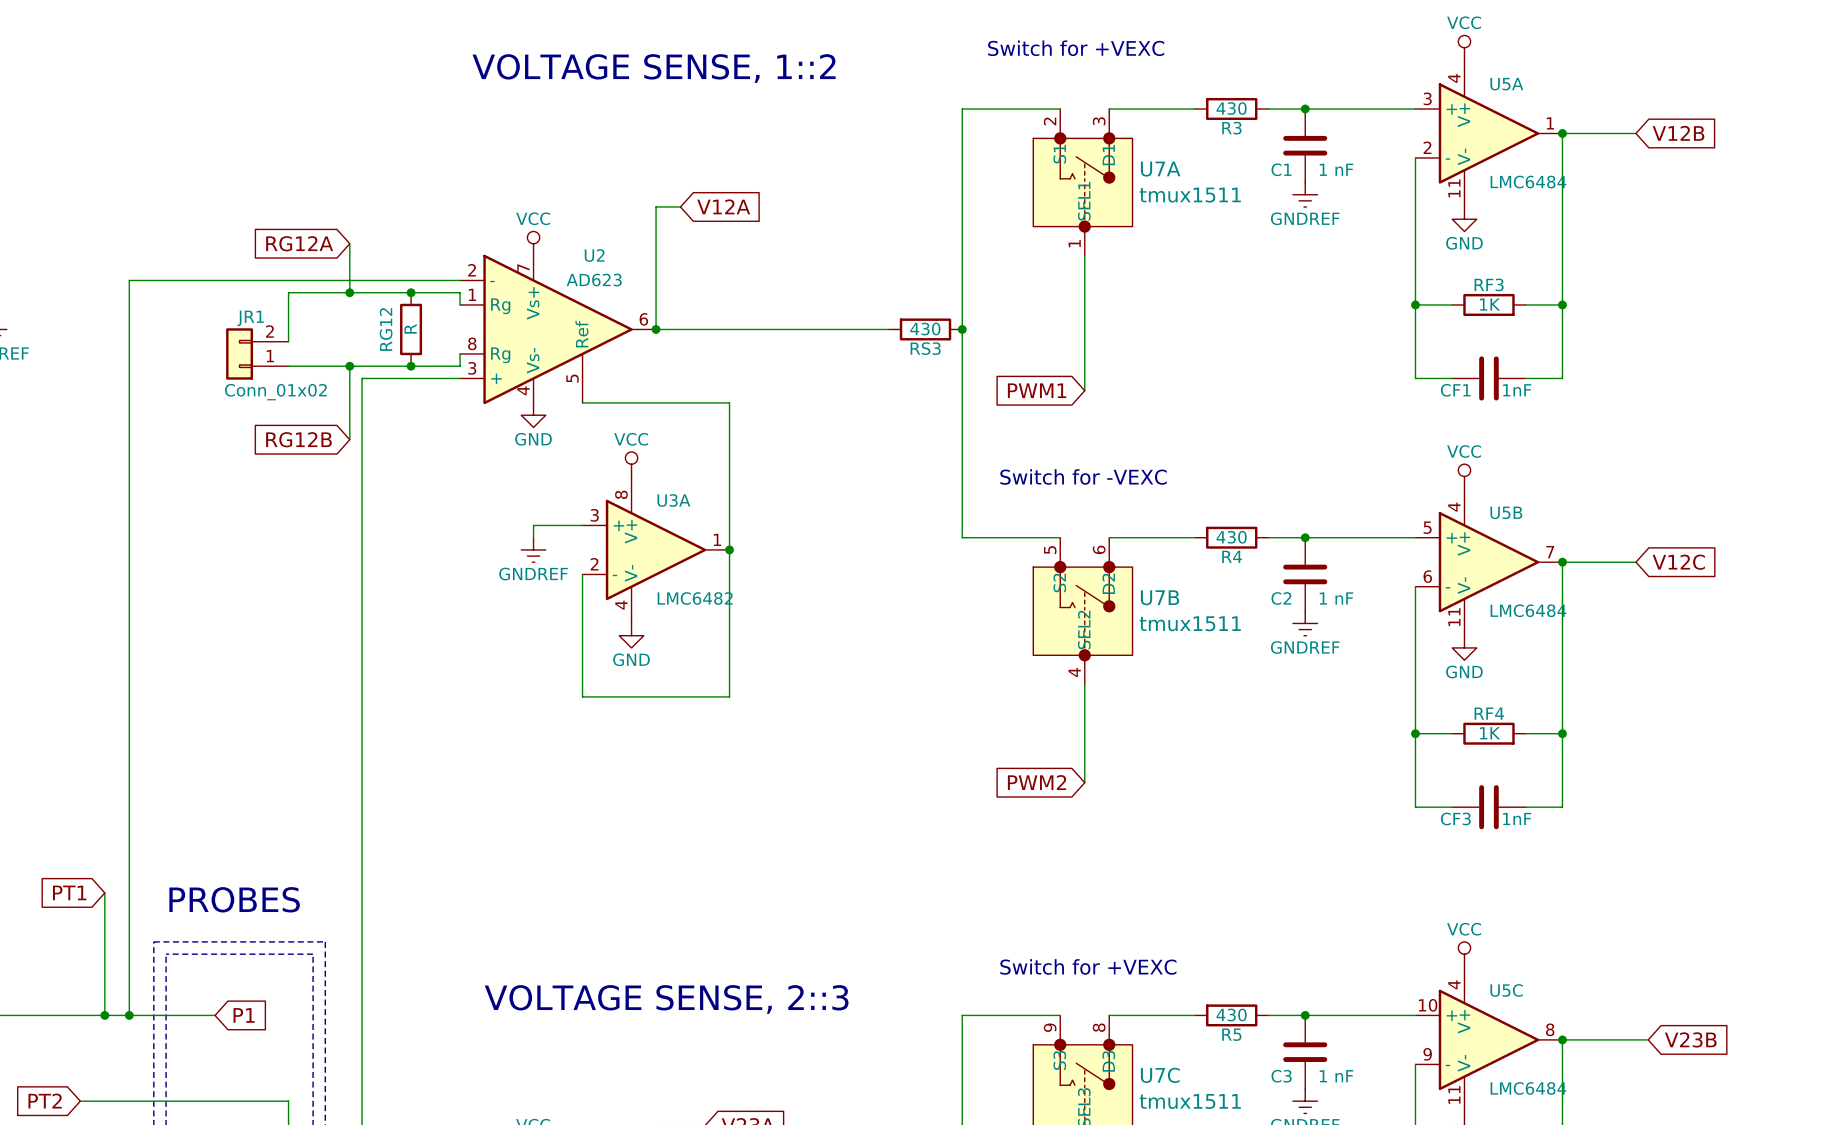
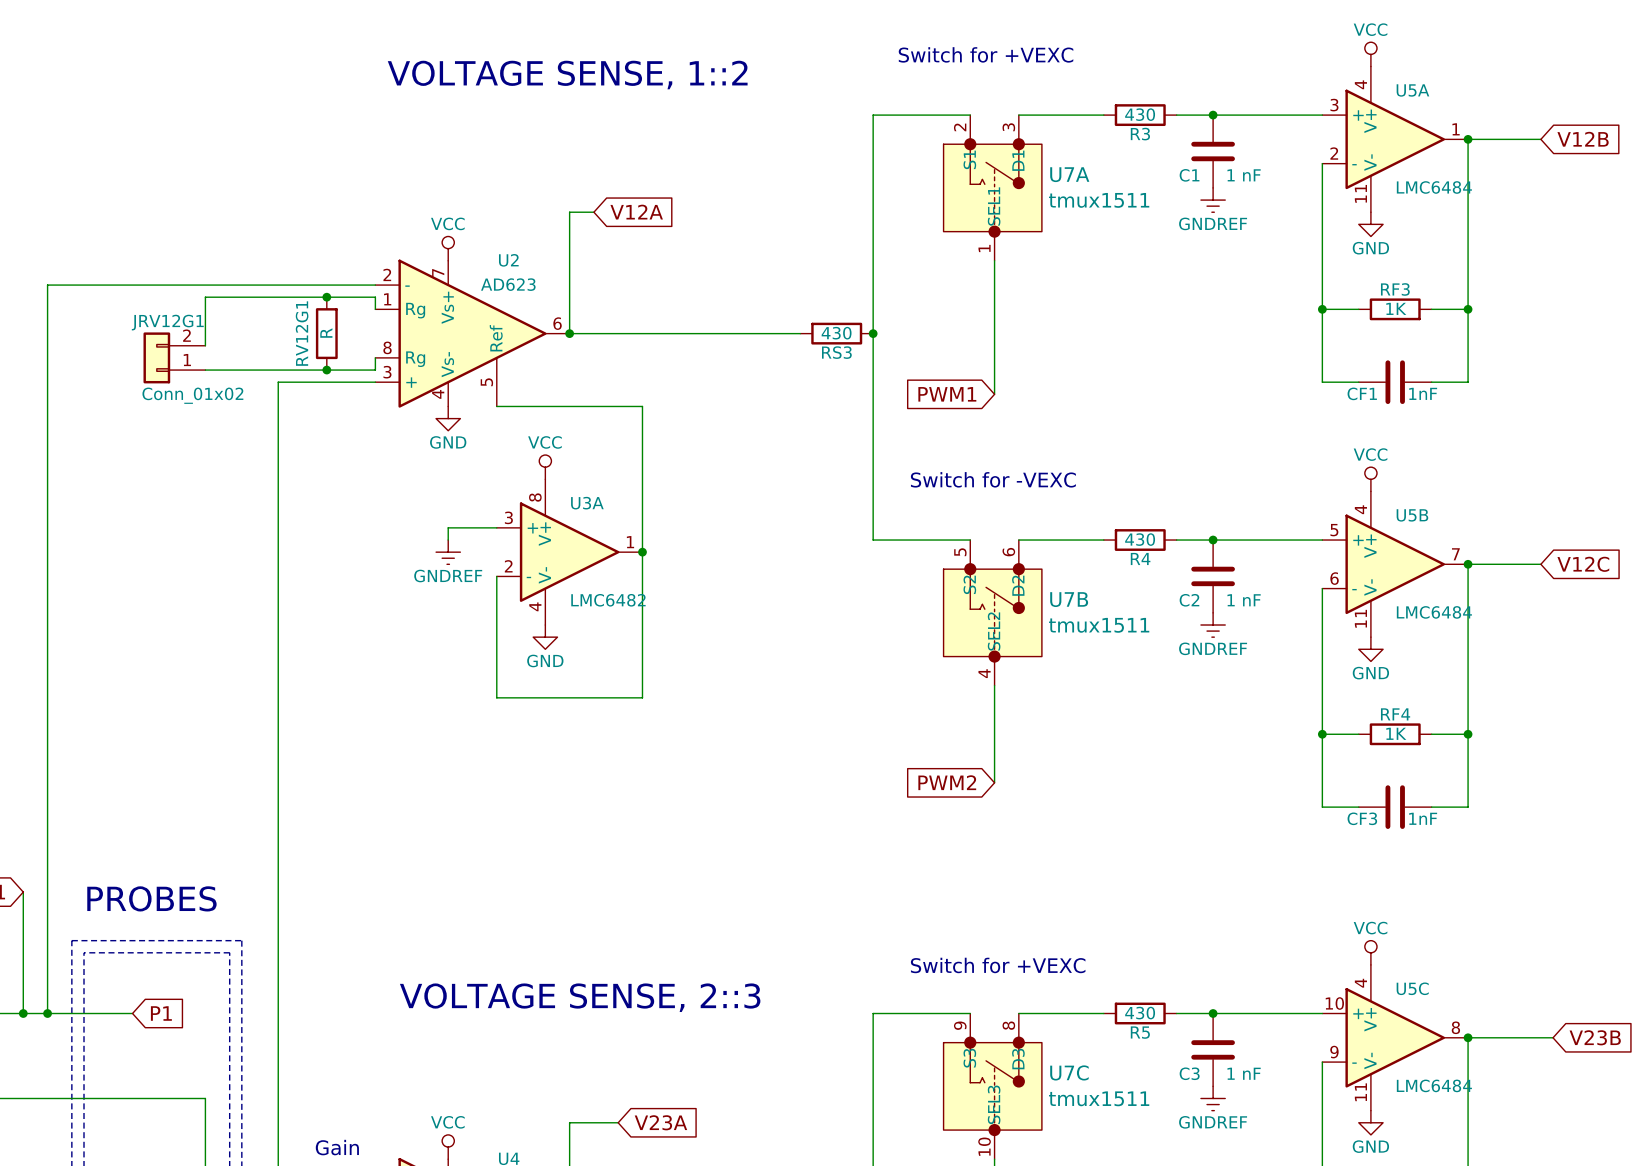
global label: RG12A (299, 243) -> none
wire: (349, 243) (349, 292) -> none
junction: (349, 292) -> none
JR1 name: JR1 (250, 318) -> JRV12G1 (167, 322)
RG12 name: RG12 (386, 329) -> RV12G1 (302, 333)
wire: (349, 366) (349, 439) -> none
junction: (349, 366) -> none
global label: RG12B (298, 439) -> none

